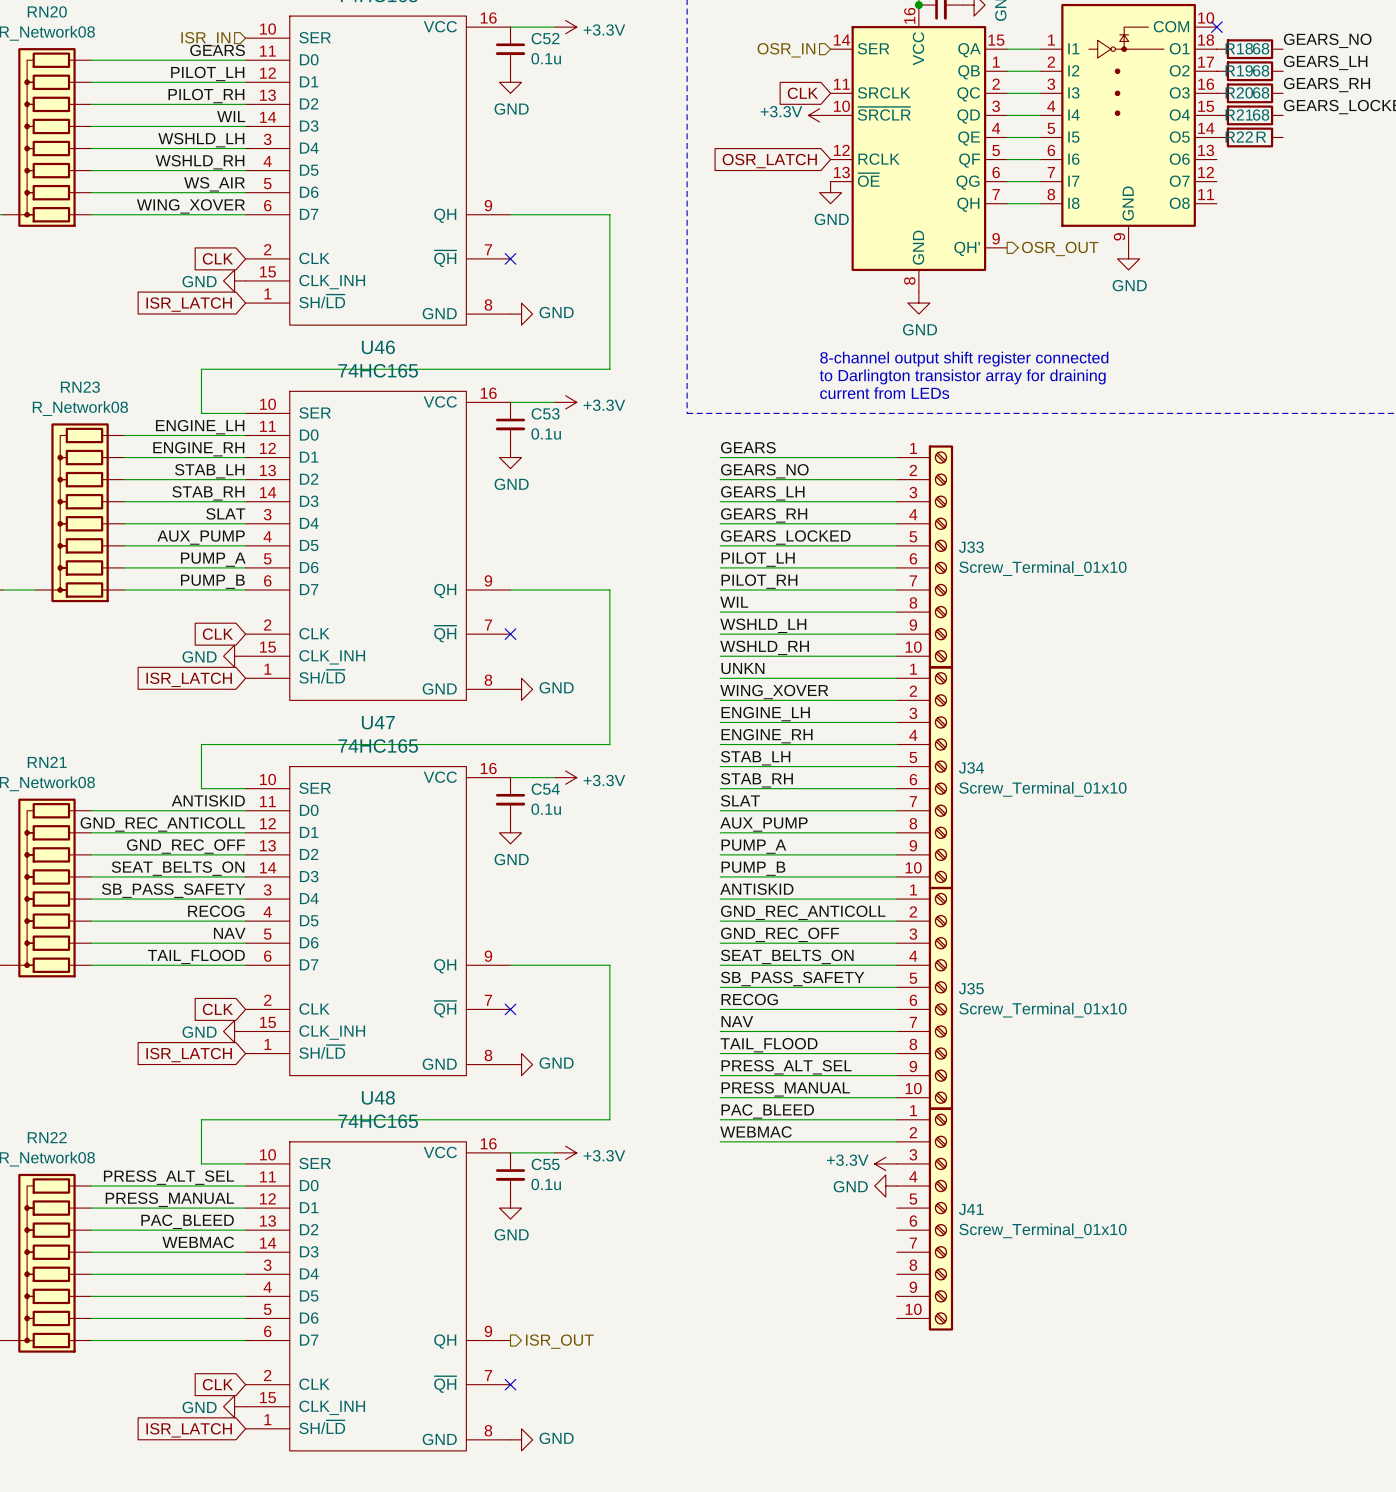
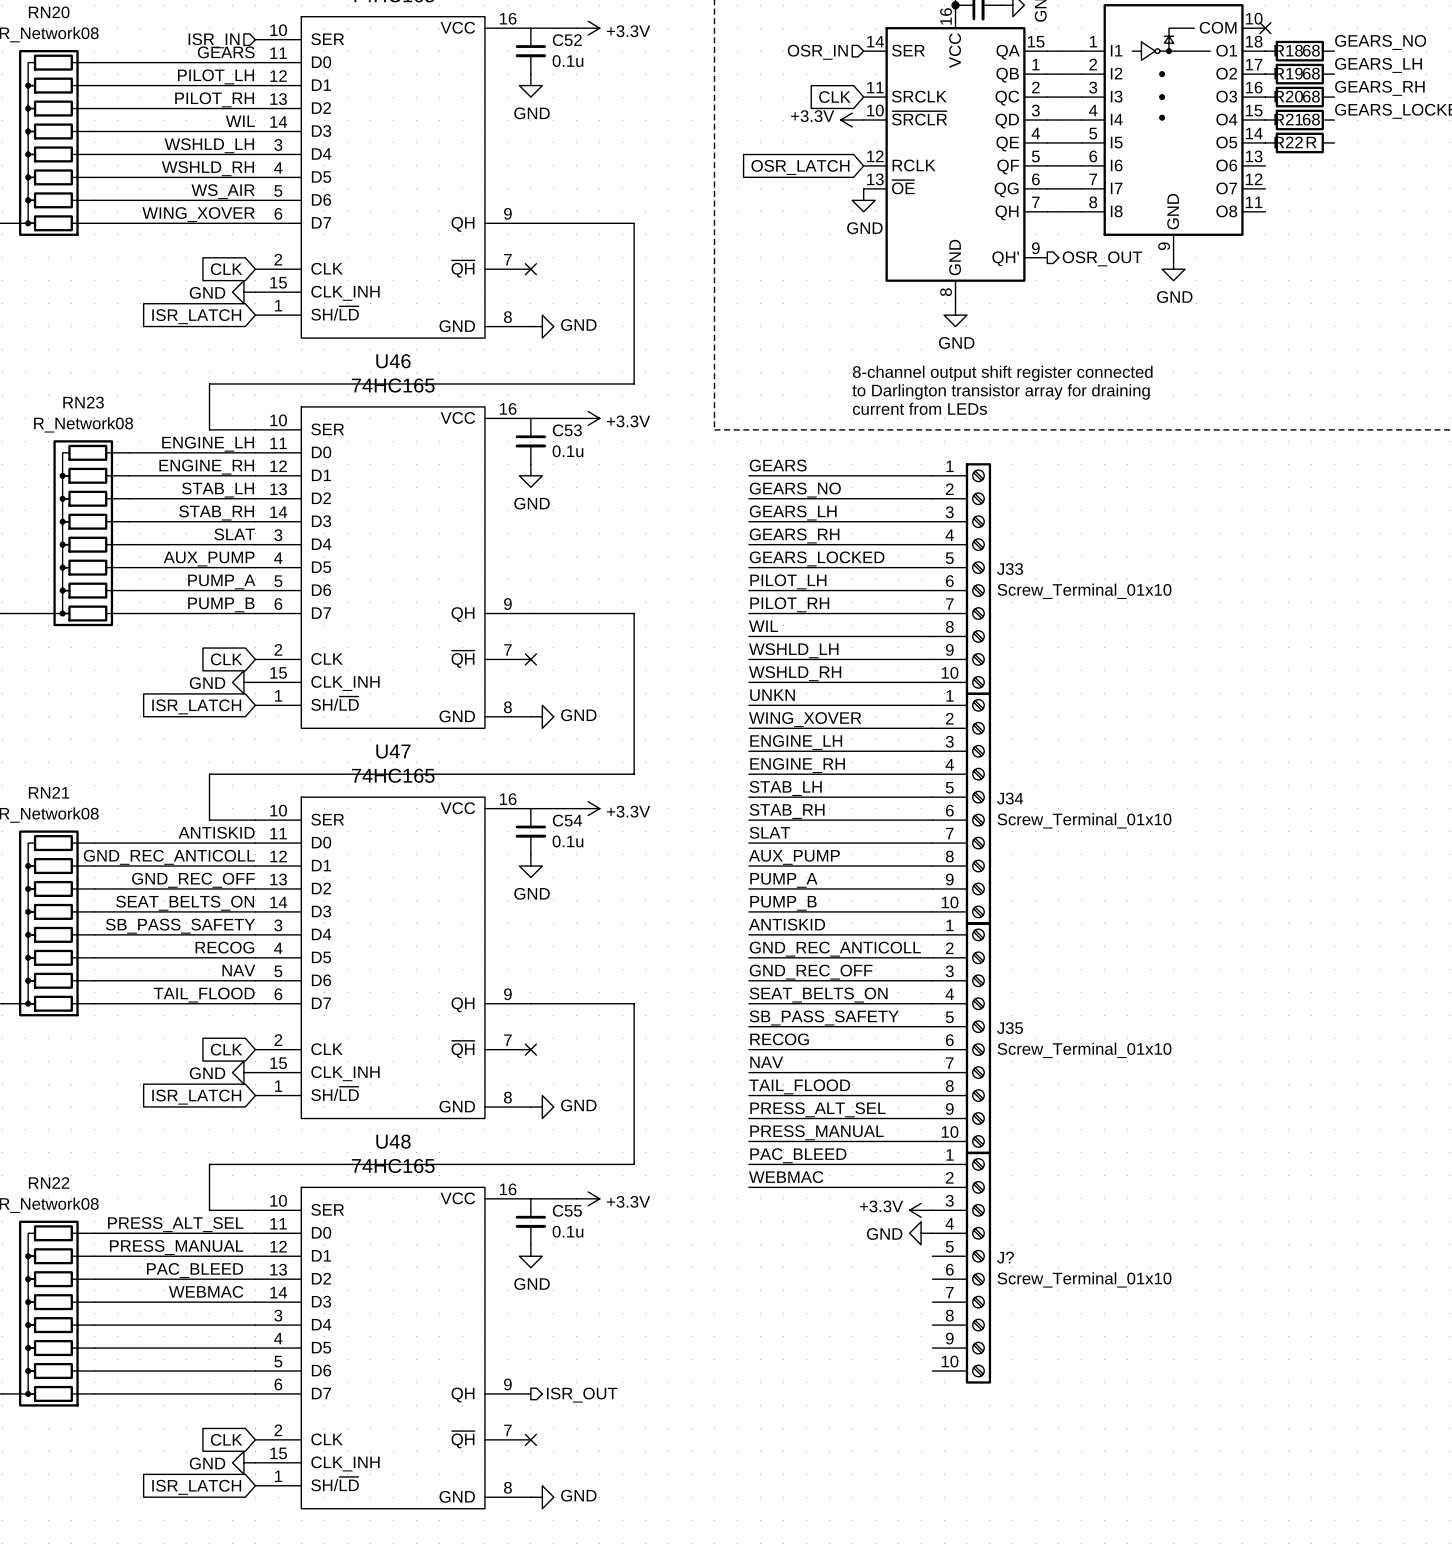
J41 name: J41 (971, 1209) -> J? (1005, 1257)

